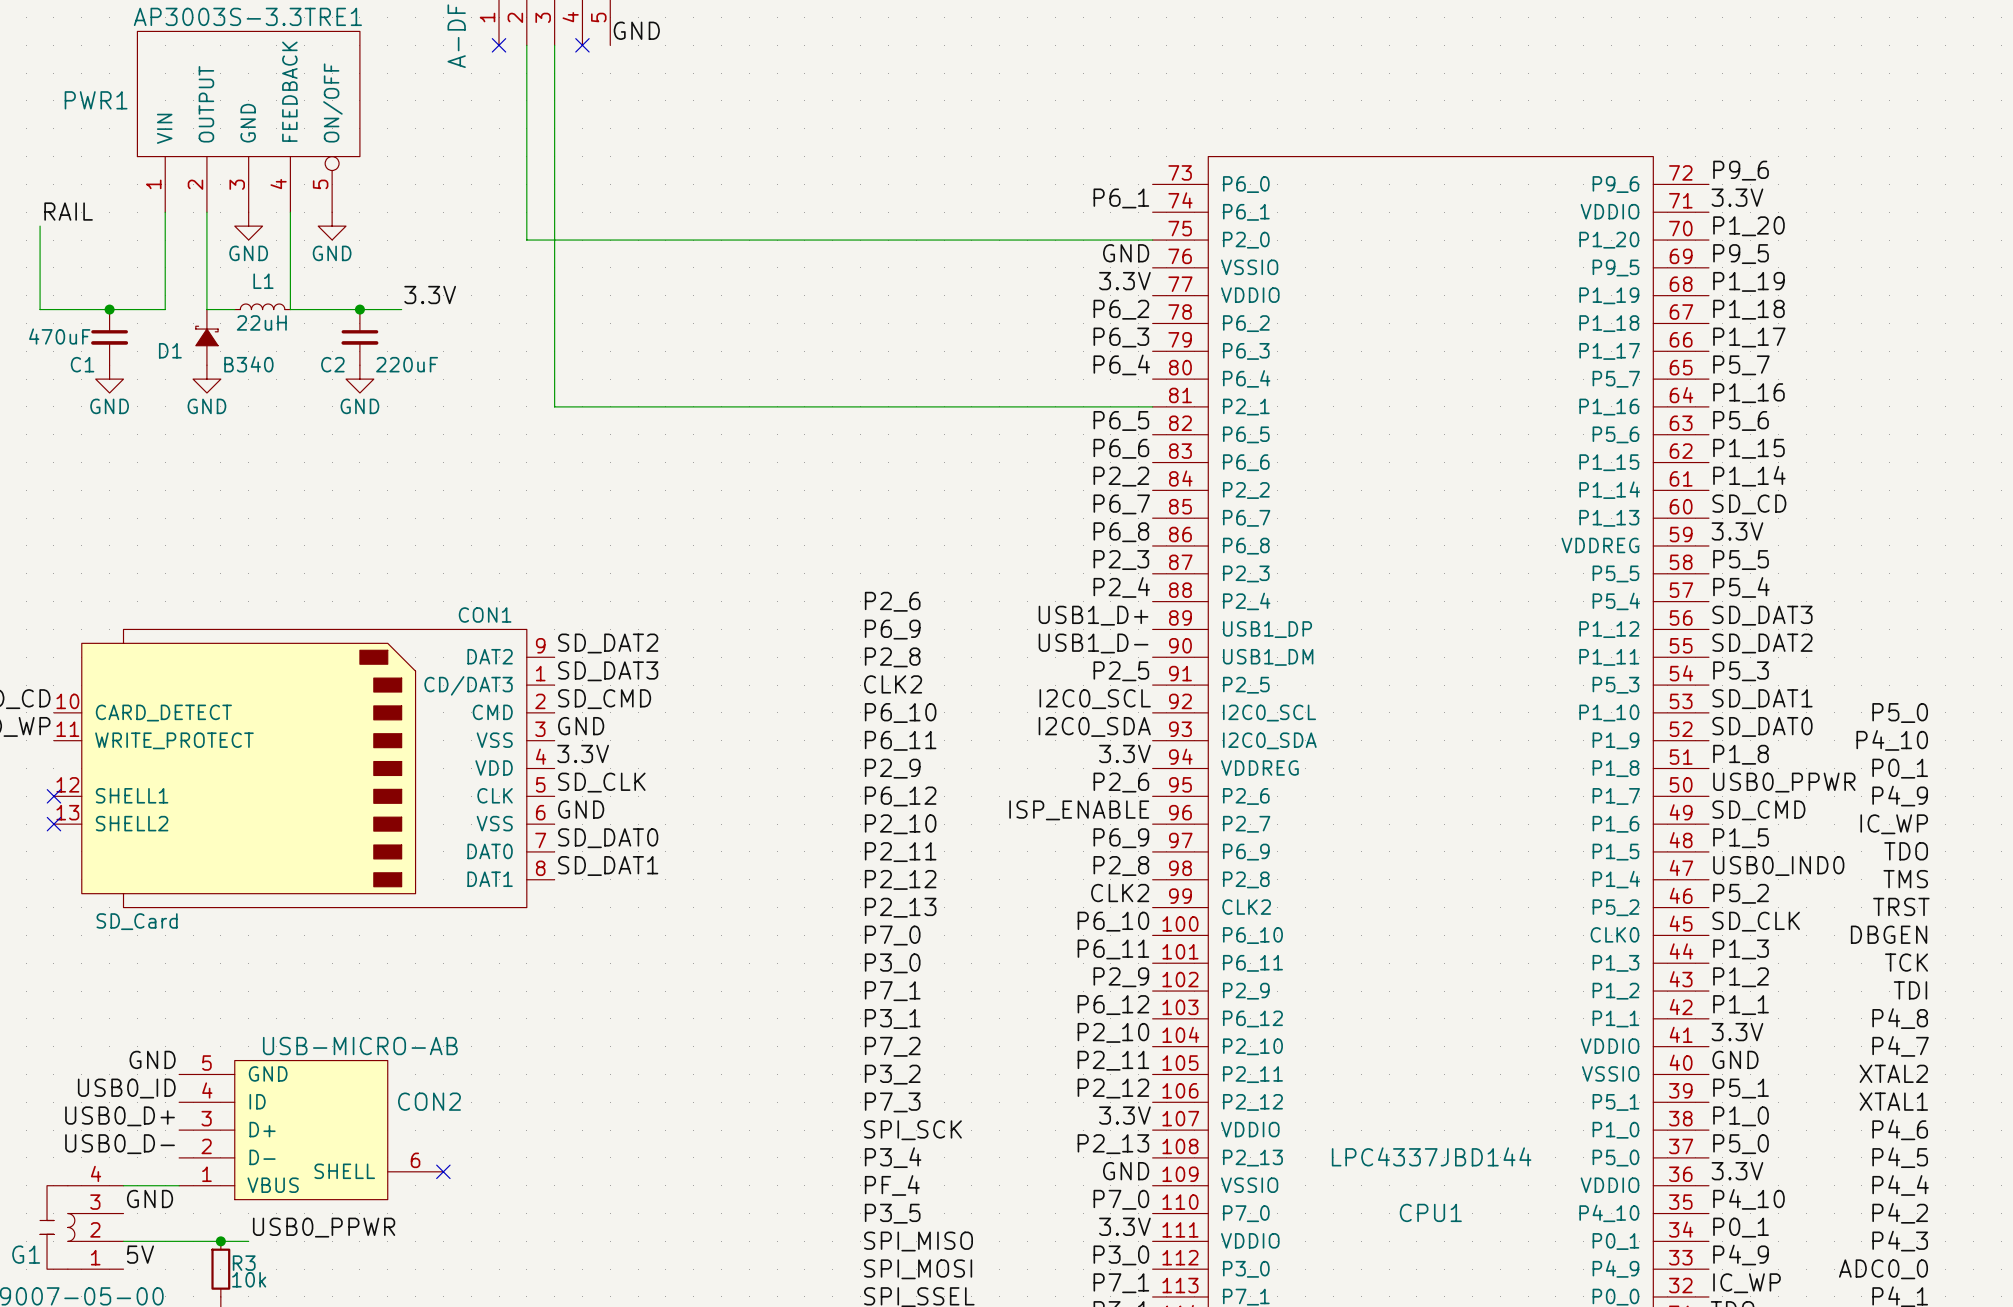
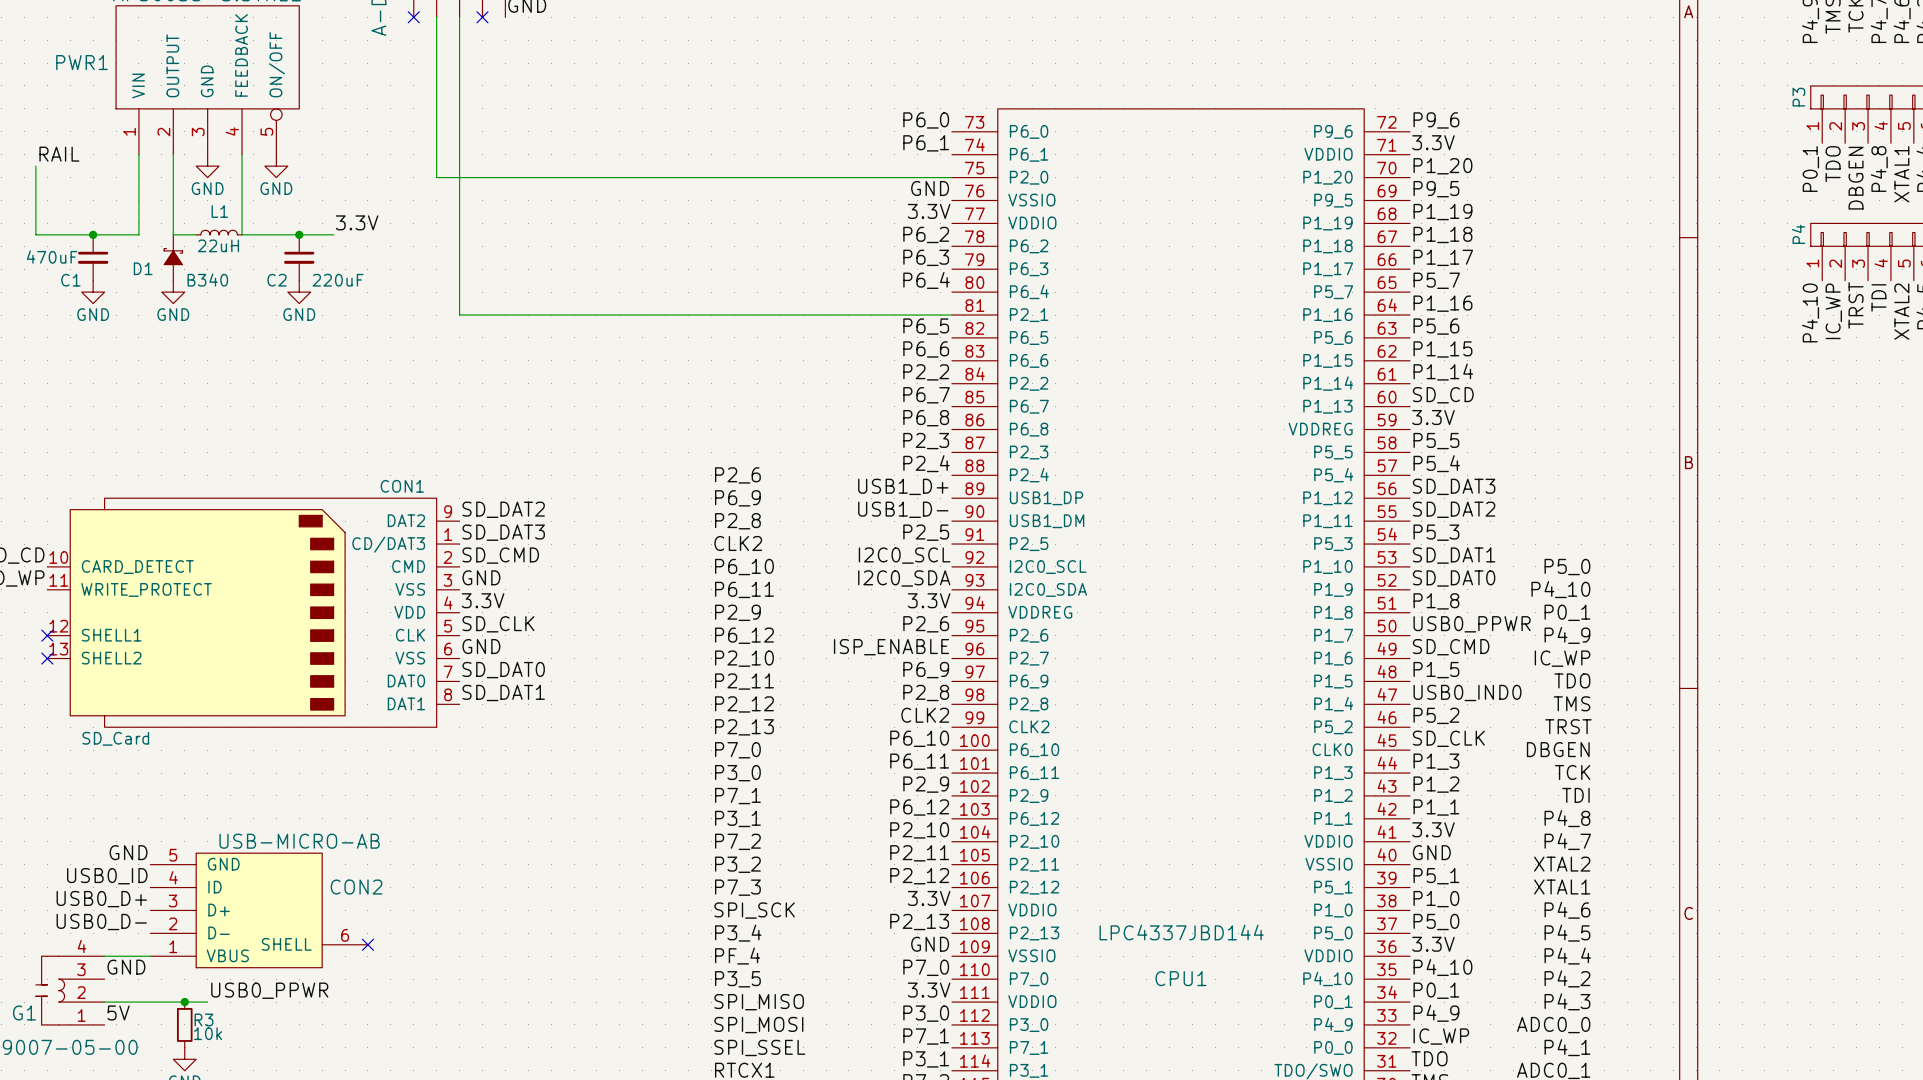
label: none -> P6_0 (926, 120)

